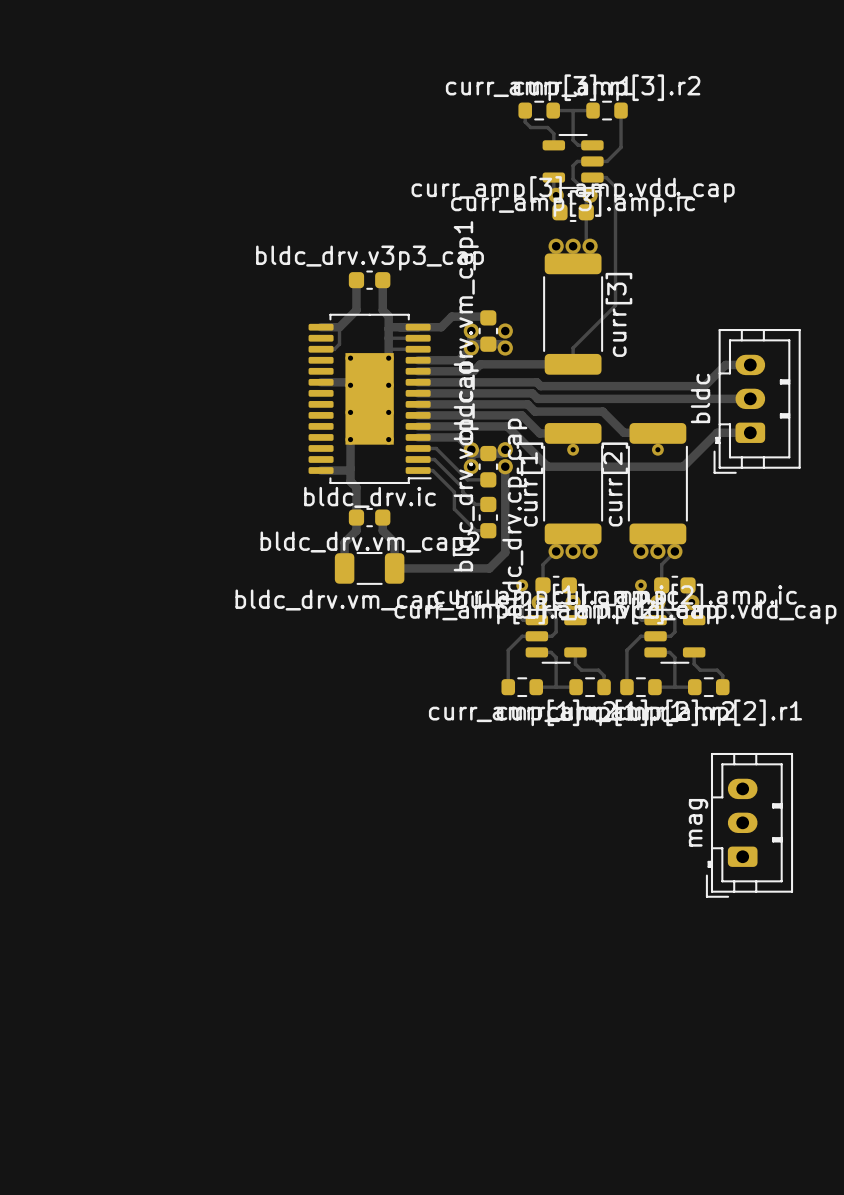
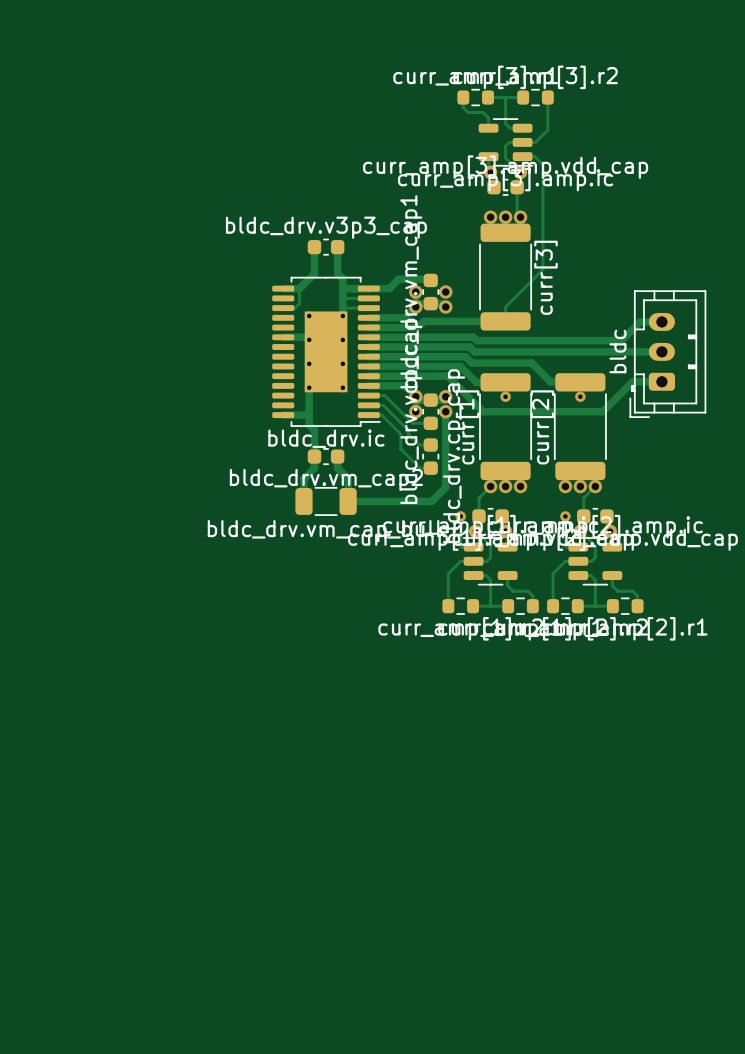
mag: (749, 825) -> none

